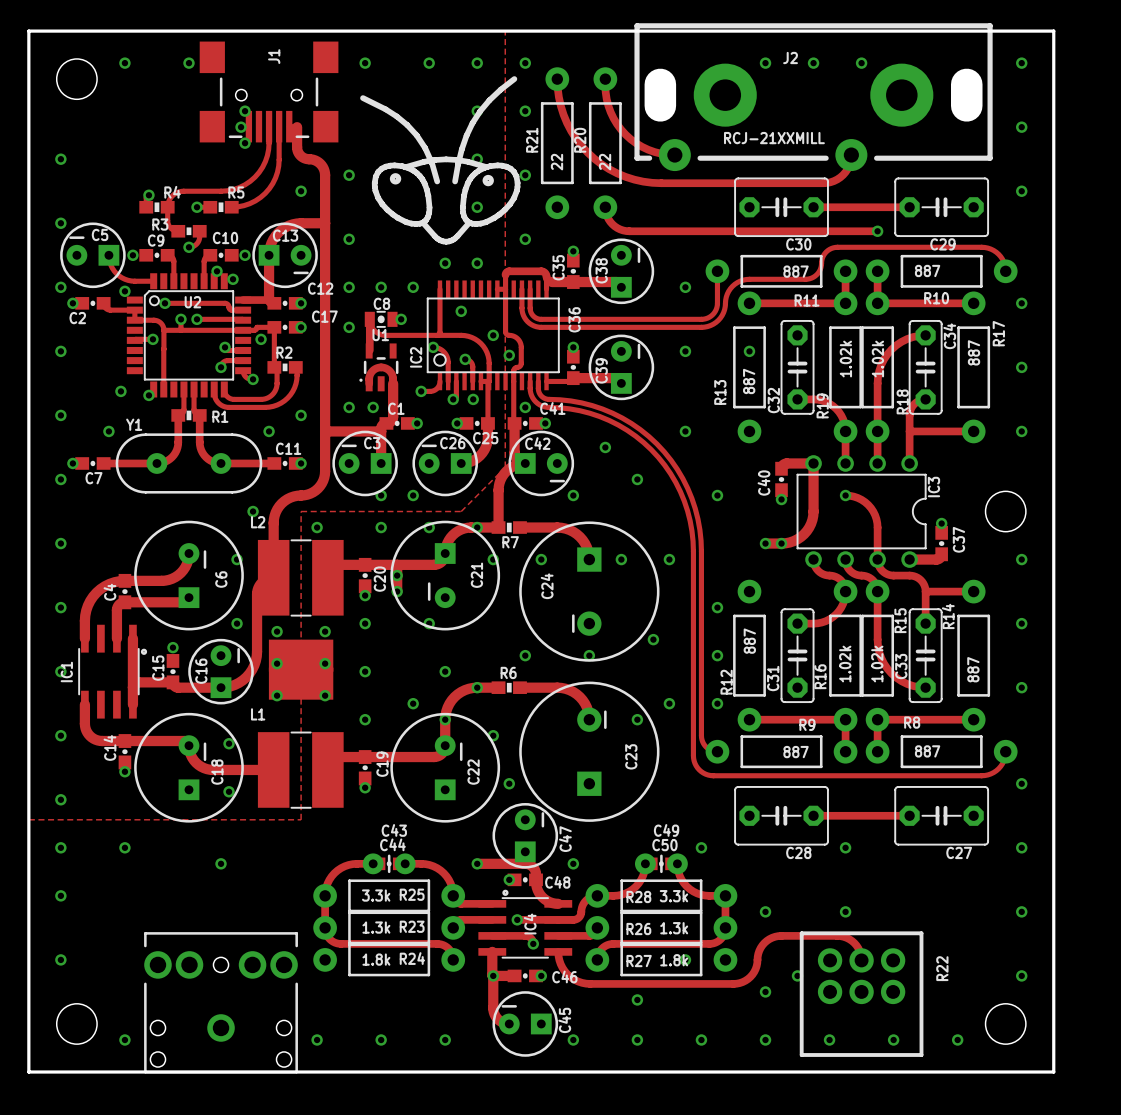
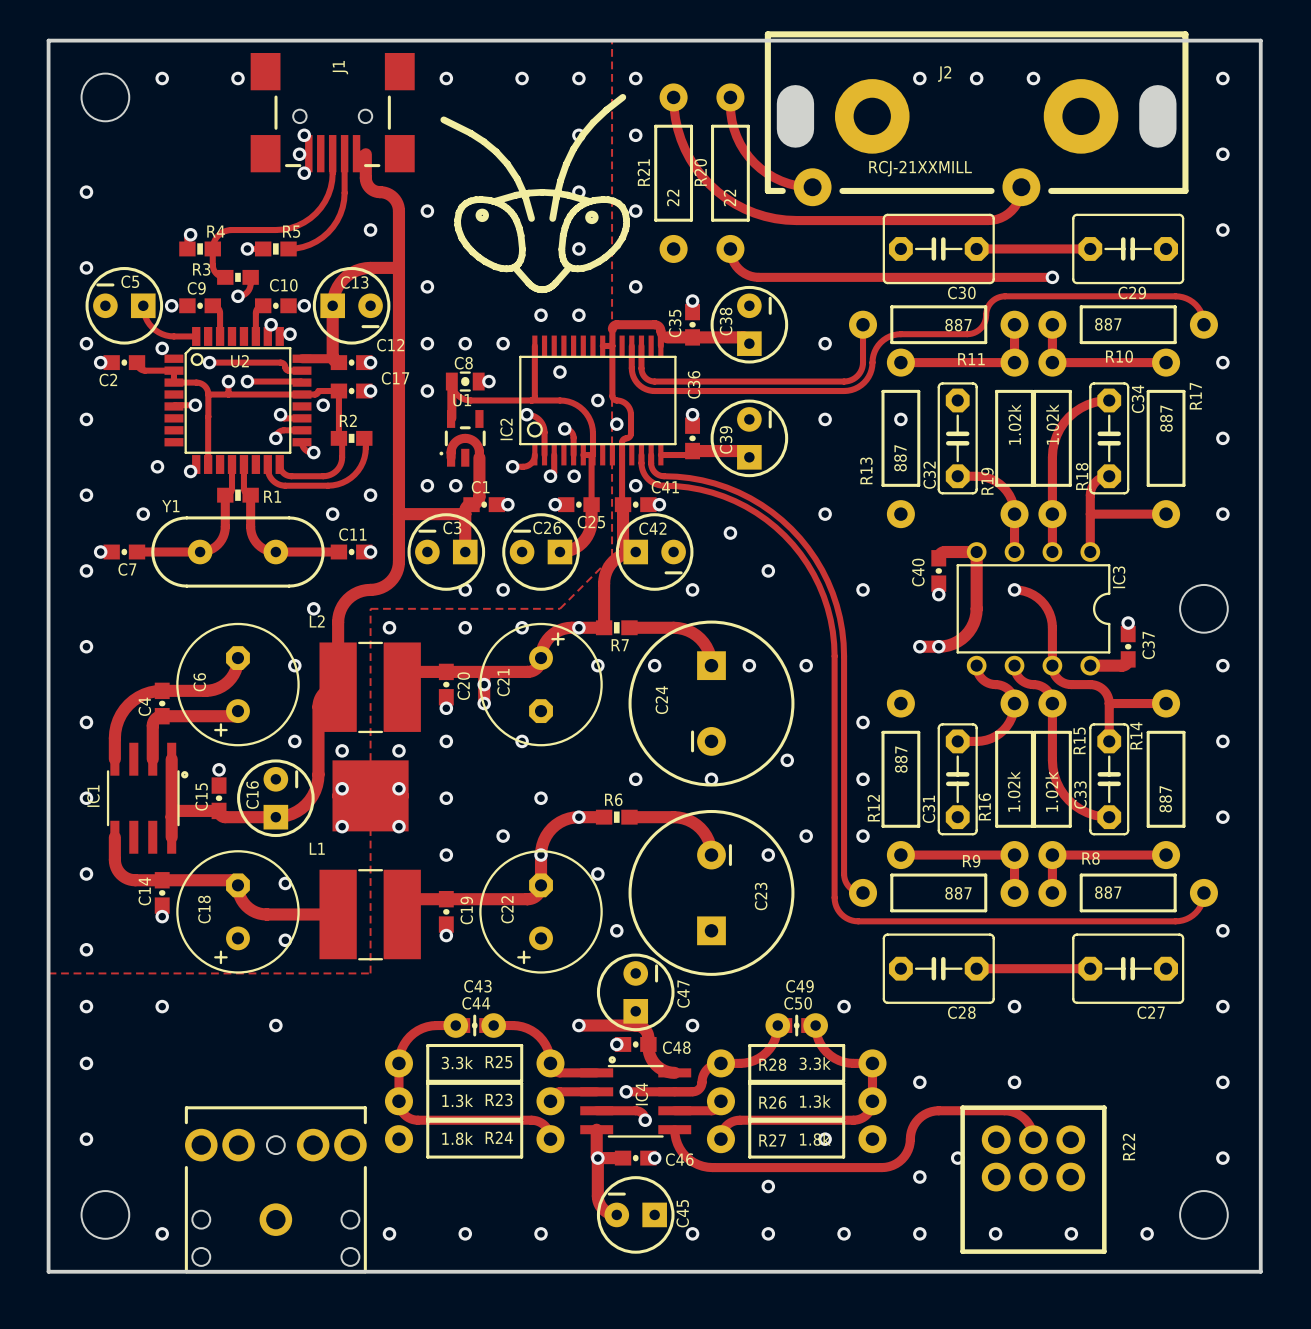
C6 footprint: [134, 520, 244, 631] -> [176, 622, 300, 747]
C21 footprint: [390, 520, 501, 631] -> [479, 622, 603, 747]
C21 name position: C21 (476, 575) -> C21 (503, 682)
C6 name position: C6 (221, 579) -> C6 (199, 682)
C18 footprint: [134, 712, 244, 823] -> [176, 850, 300, 974]
C22 footprint: [390, 712, 501, 823] -> [479, 850, 603, 974]
C18 name position: C18 (217, 772) -> C18 (204, 909)
C22 name position: C22 (473, 772) -> C22 (507, 909)

